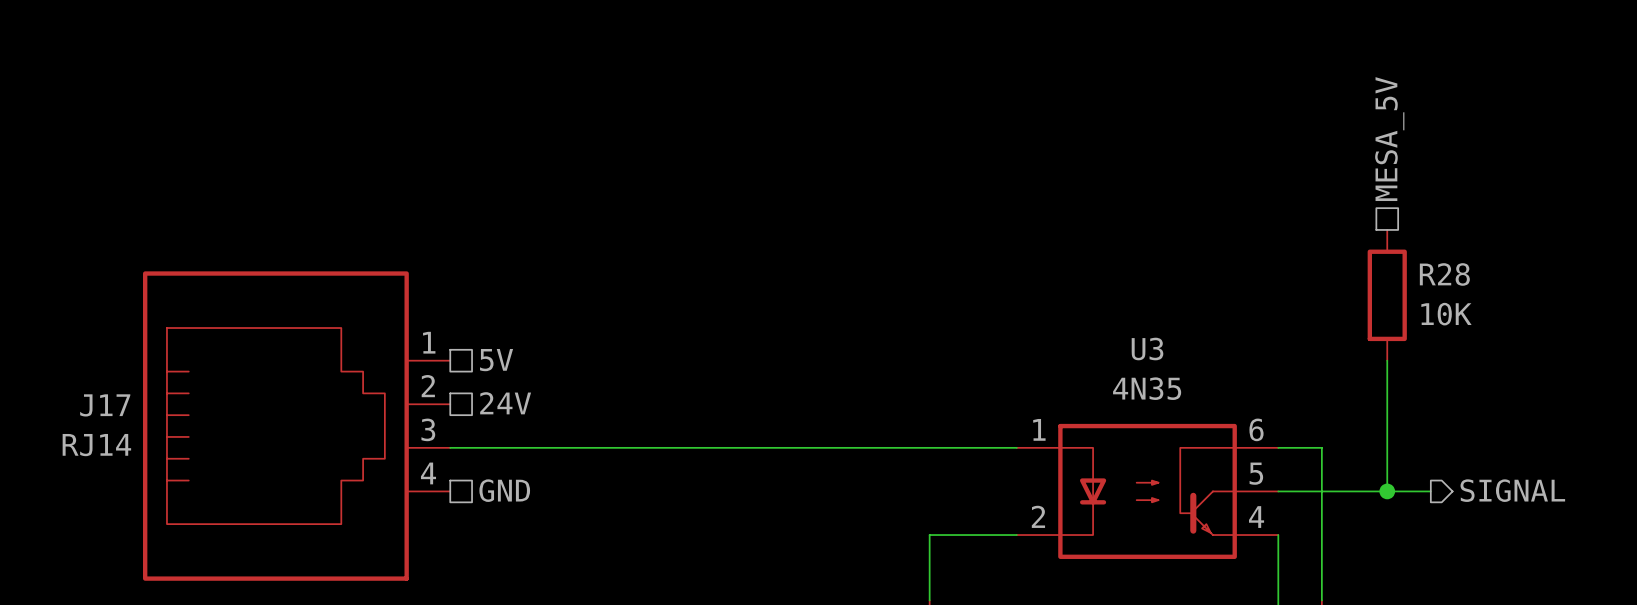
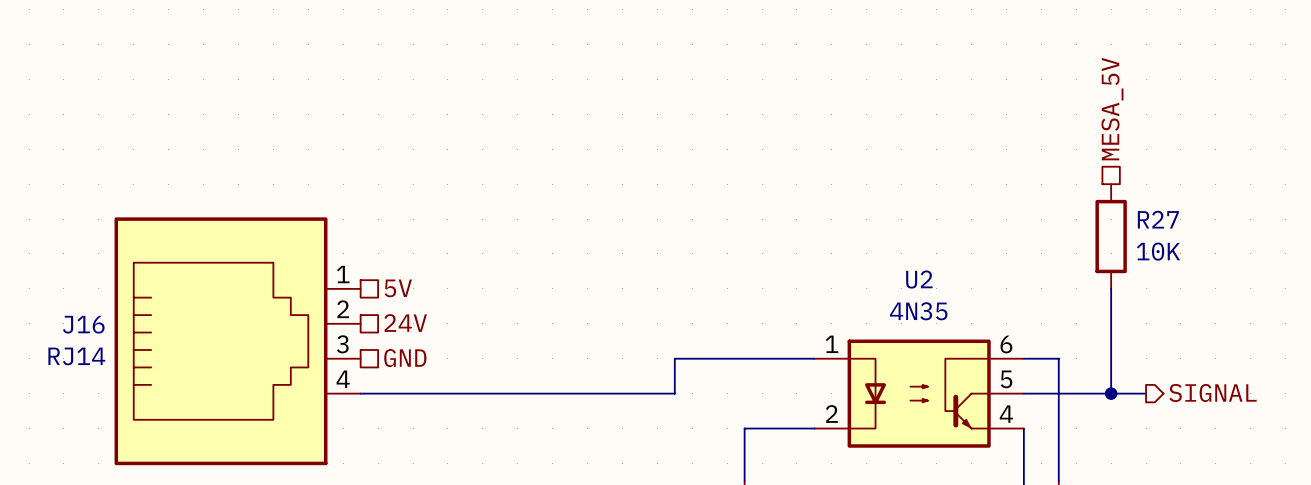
R28 name: R28 (1444, 274) -> R27 (1158, 219)
U3 name: U3 (1147, 349) -> U2 (919, 279)
J17 name: J17 (105, 405) -> J16 (83, 324)
wire: (450, 447) (842, 447) -> (360, 393) (674, 393) (674, 358)
hierarchical label position: GND (504, 490) -> GND (405, 358)

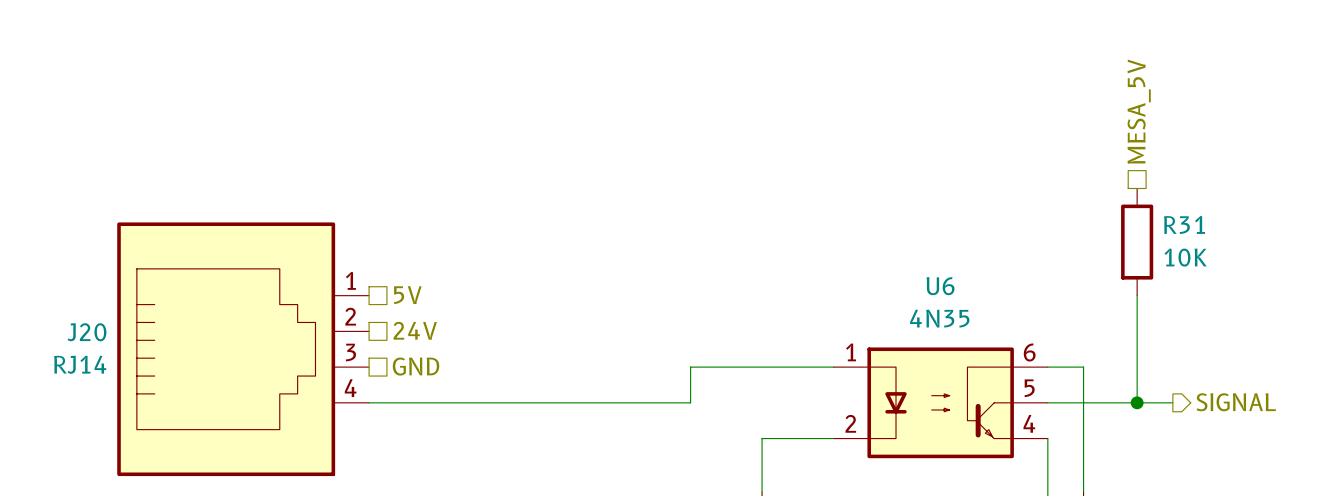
R27 name: R27 (1158, 219) -> R31 (1184, 224)
U2 name: U2 (919, 279) -> U6 (940, 286)
J16 name: J16 (83, 324) -> J20 (86, 332)

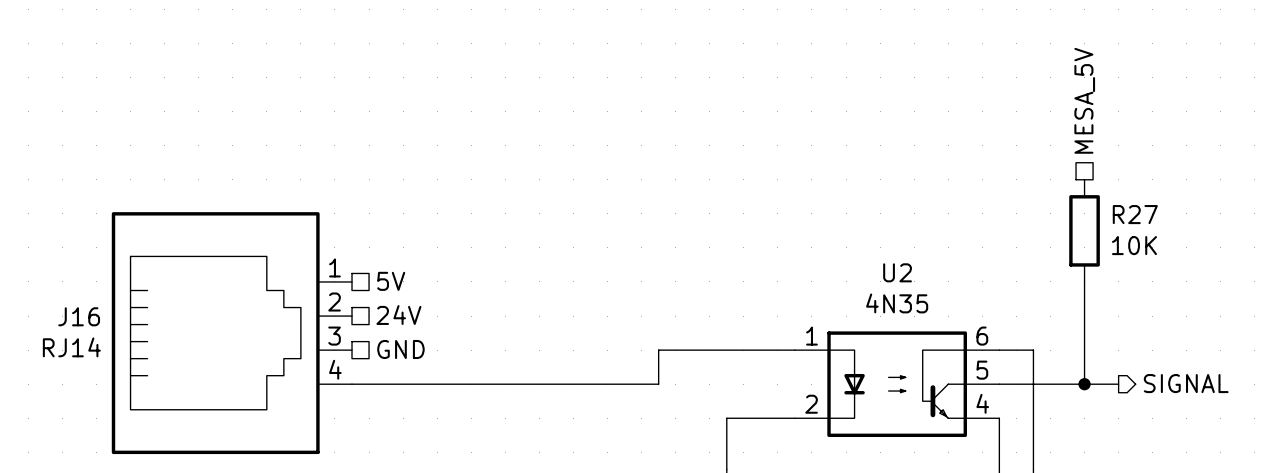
R31 name: R31 (1184, 224) -> R27 (1135, 214)
U6 name: U6 (940, 286) -> U2 (897, 272)
J20 name: J20 (86, 332) -> J16 (79, 316)

